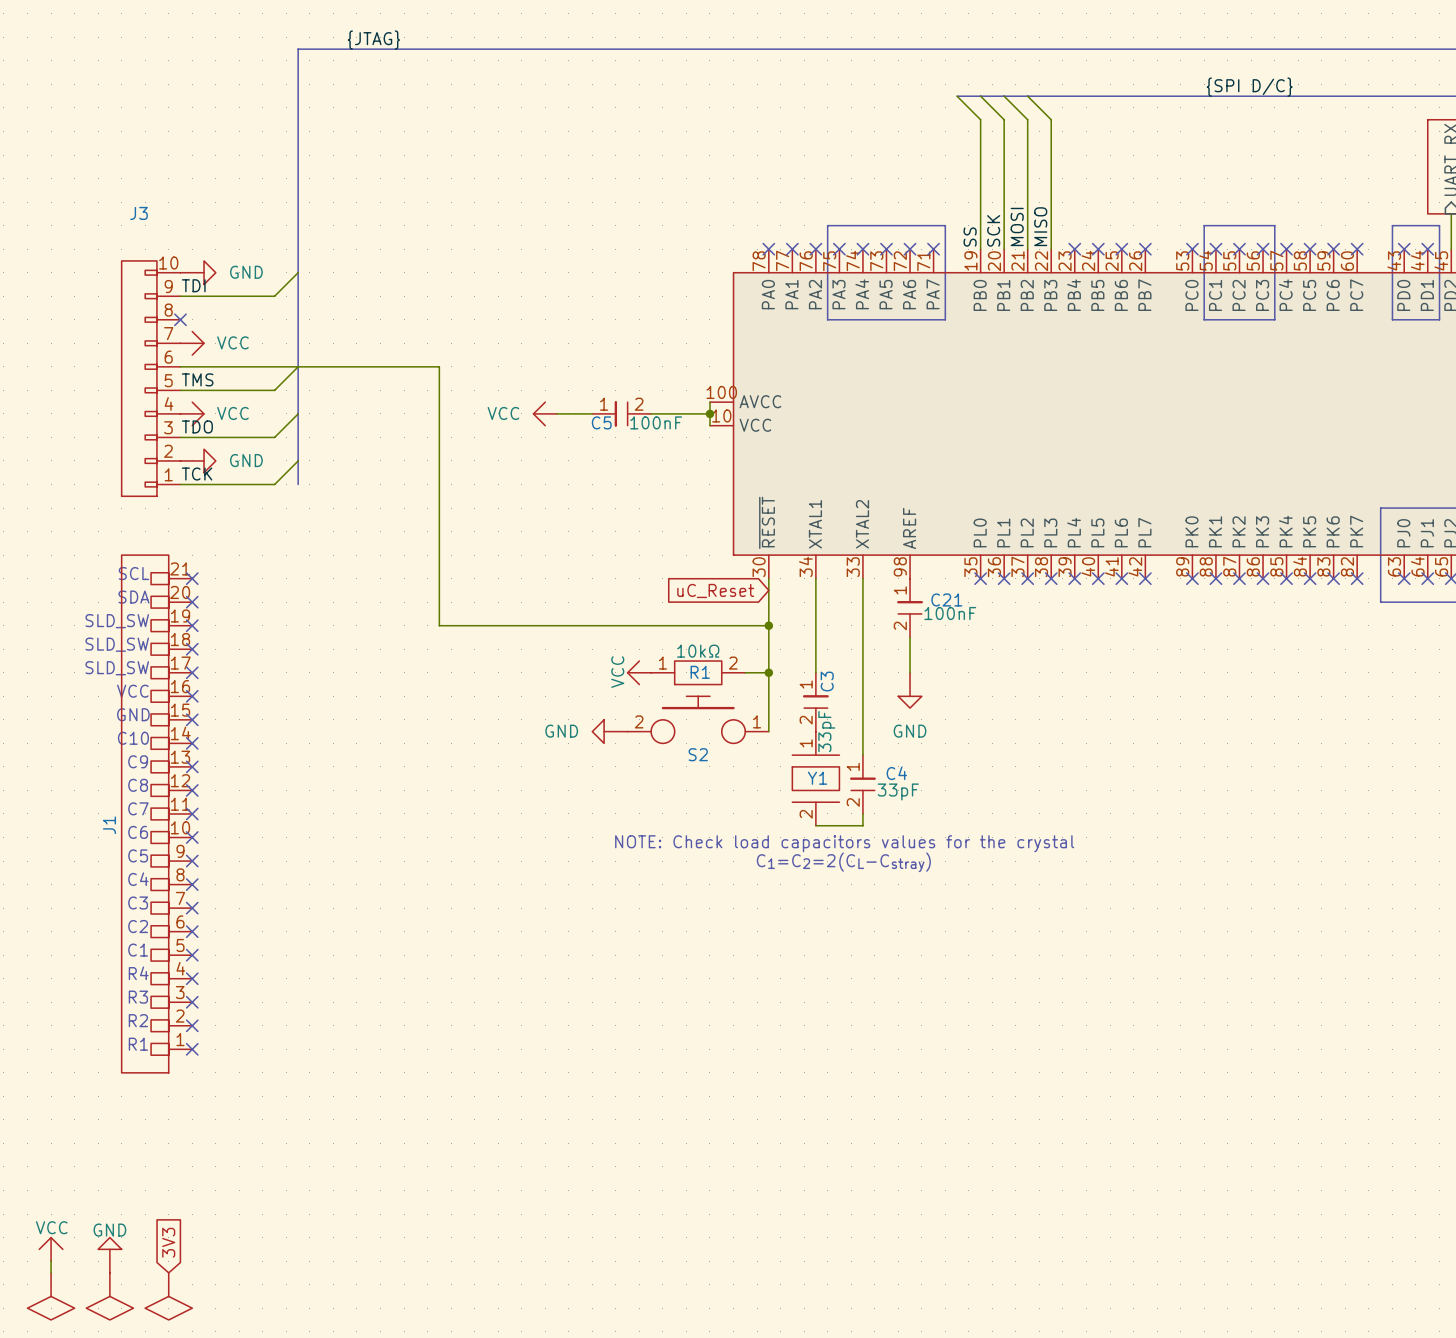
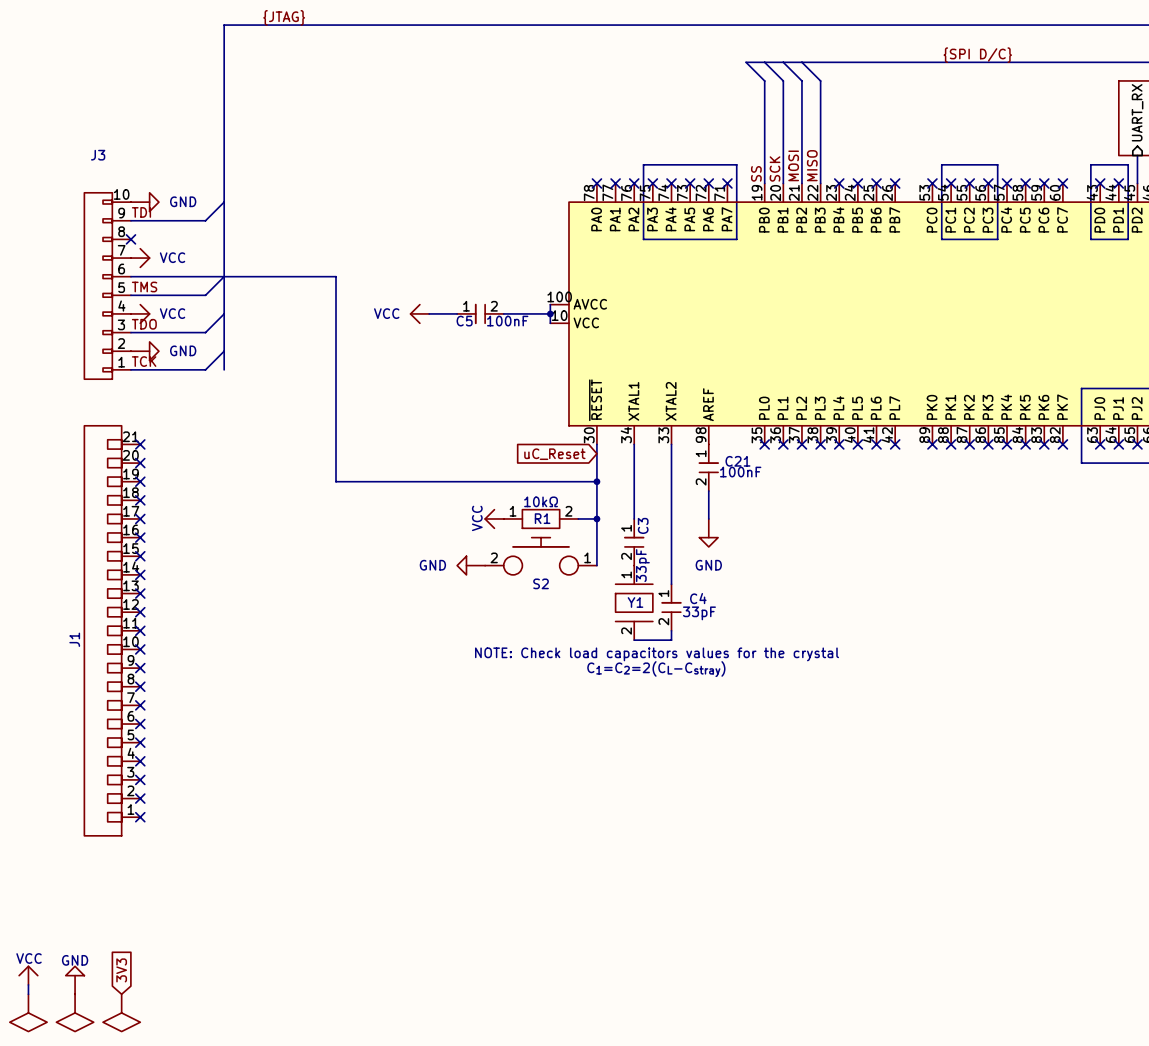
text: SCL (133, 573) -> none
text: SDA (133, 597) -> none
text: SLD_SW (117, 621) -> none
text: SLD_SW (117, 644) -> none
text: SLD_SW (117, 668) -> none
text: VCC (132, 691) -> none
text: GND (133, 714) -> none
text: C10 (133, 738) -> none
text: C9 (138, 761) -> none
text: C8 (138, 785) -> none
text: C7 (138, 808) -> none
text: C6 (138, 832) -> none
text: C5 (138, 855) -> none
text: C4 (138, 879) -> none
text: C3 (138, 903) -> none
text: C2 (138, 926) -> none
text: C1 (138, 950) -> none
text: R4 (138, 973) -> none
text: R3 (138, 997) -> none
text: R2 (138, 1020) -> none
text: R1 (138, 1044) -> none

